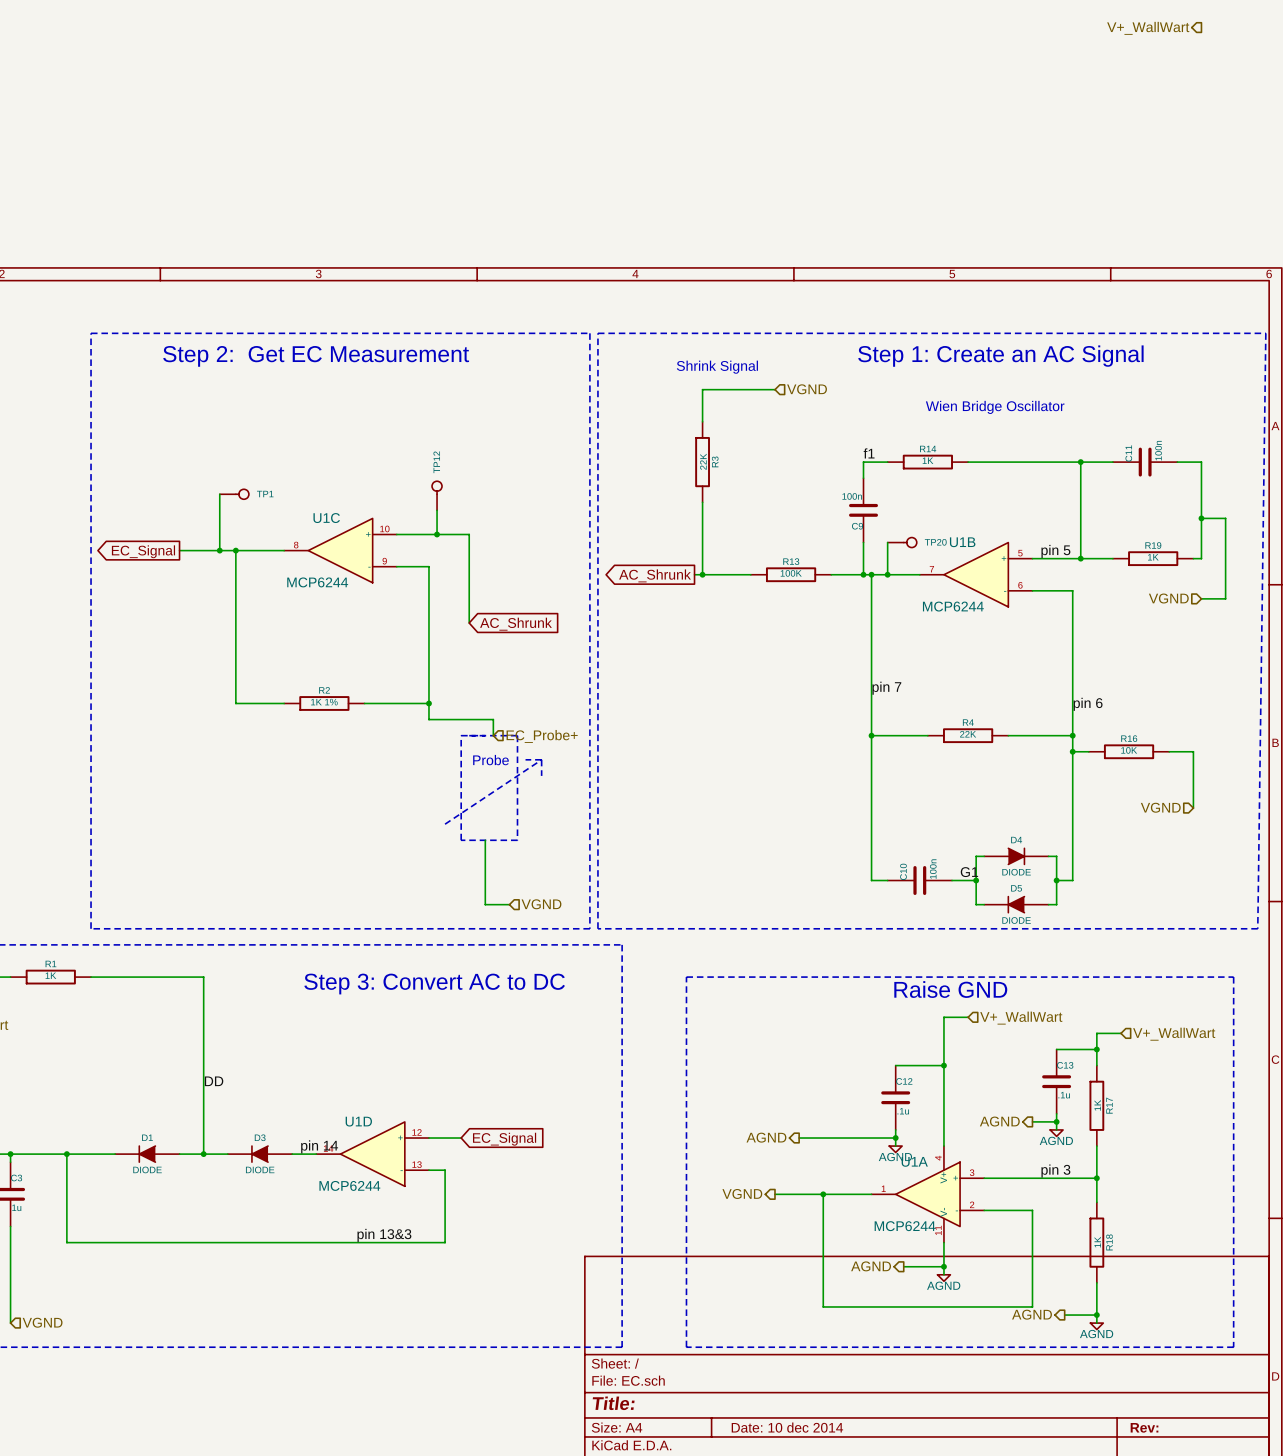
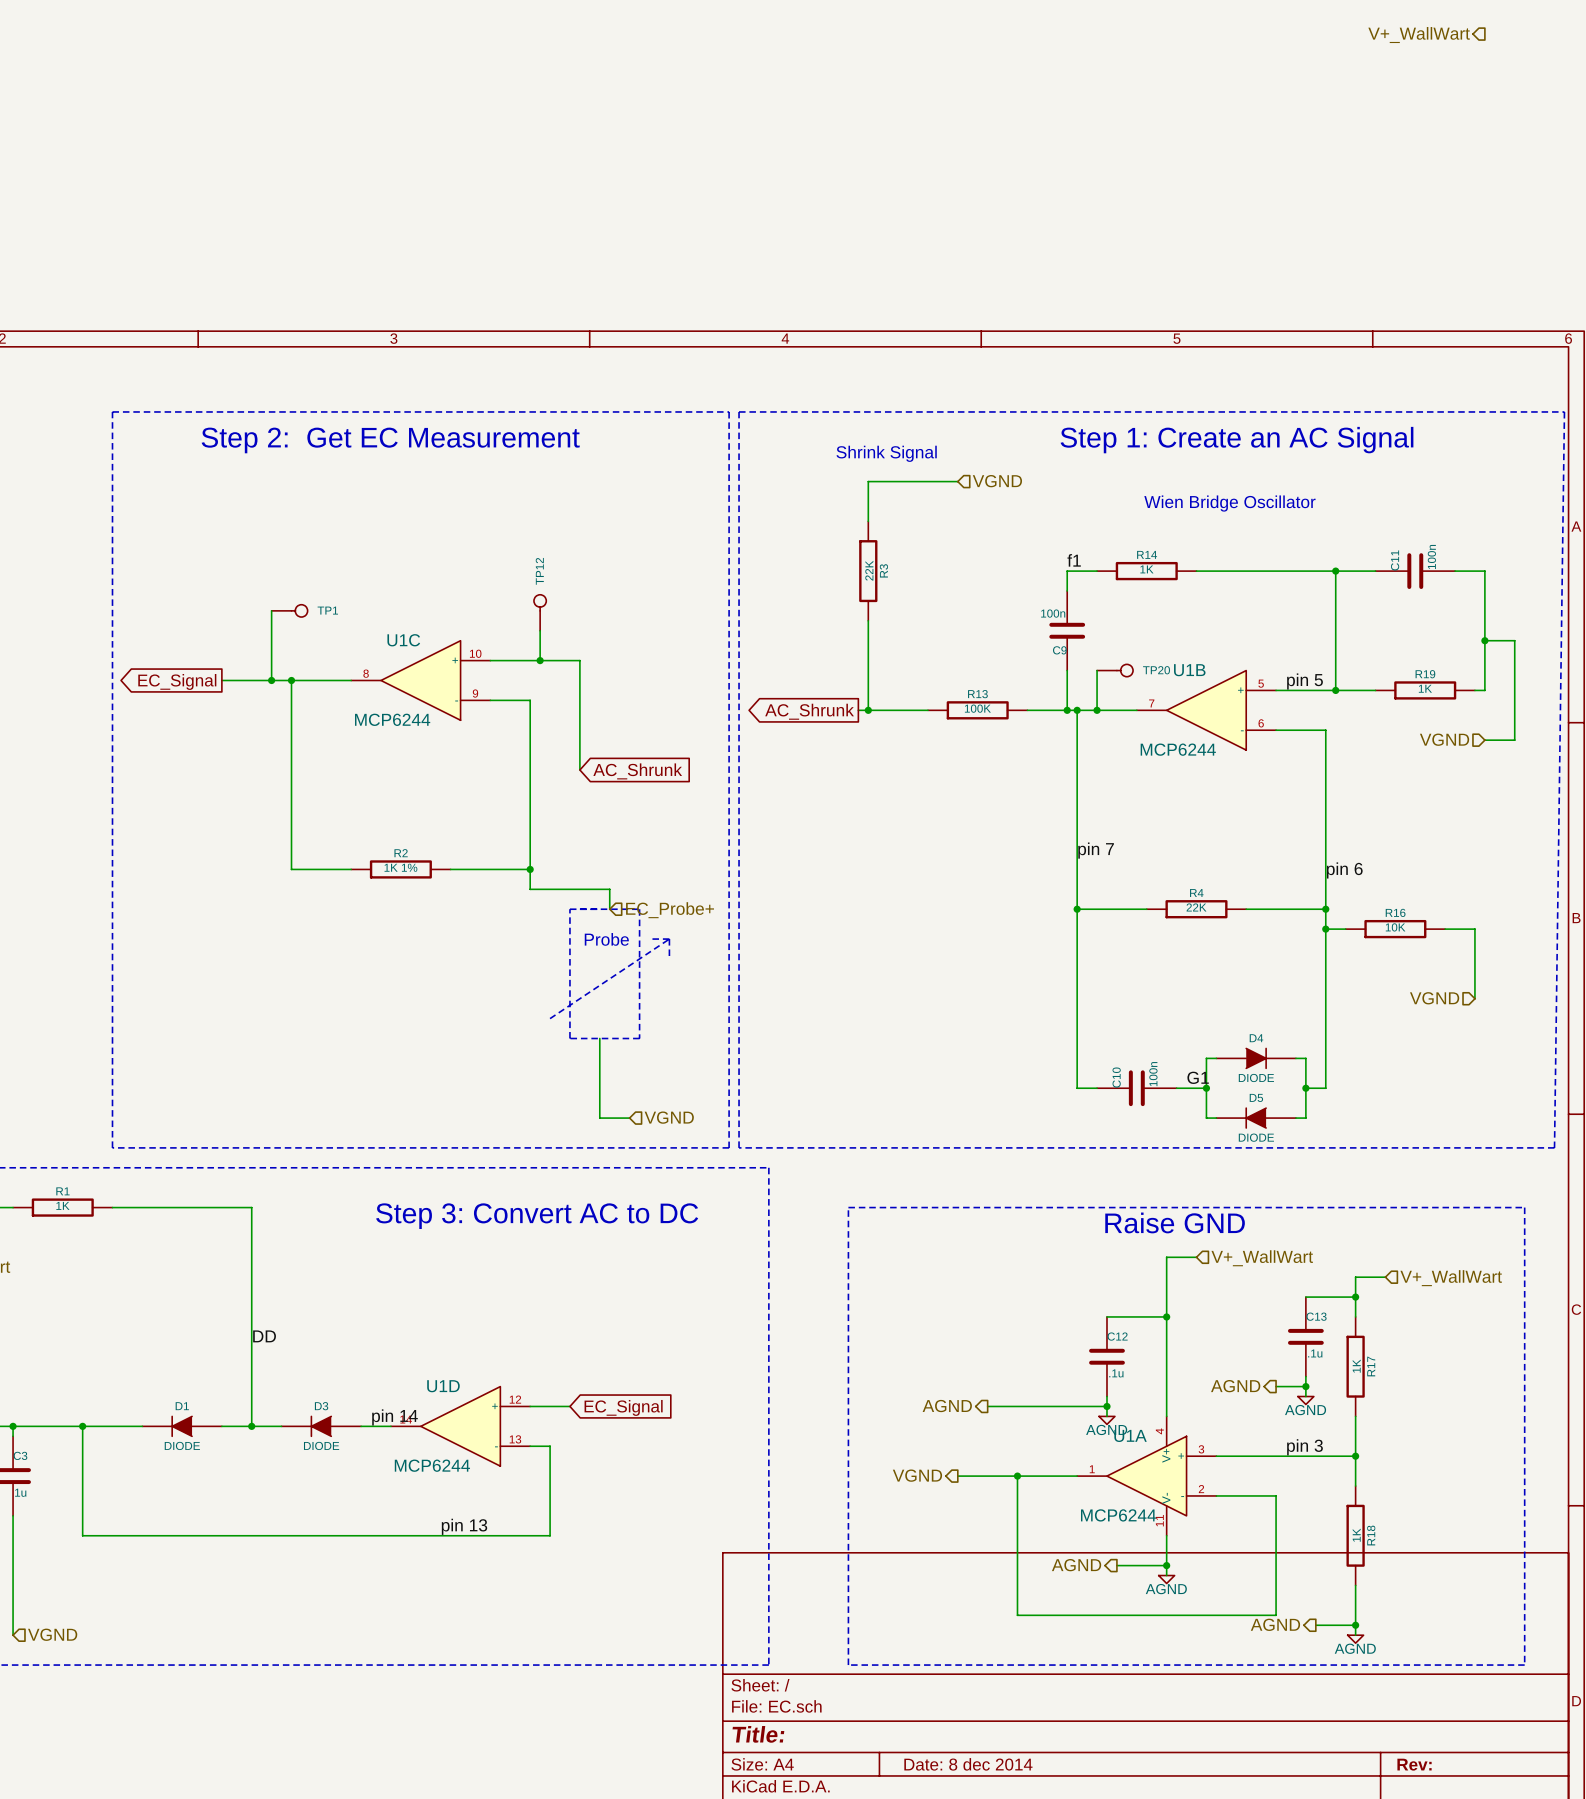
label: pin 13&3 (384, 1235) -> pin 13 (464, 1526)
title block: Date: 10 dec 2014 (787, 1427) -> Date: 8 dec 2014 (968, 1764)

